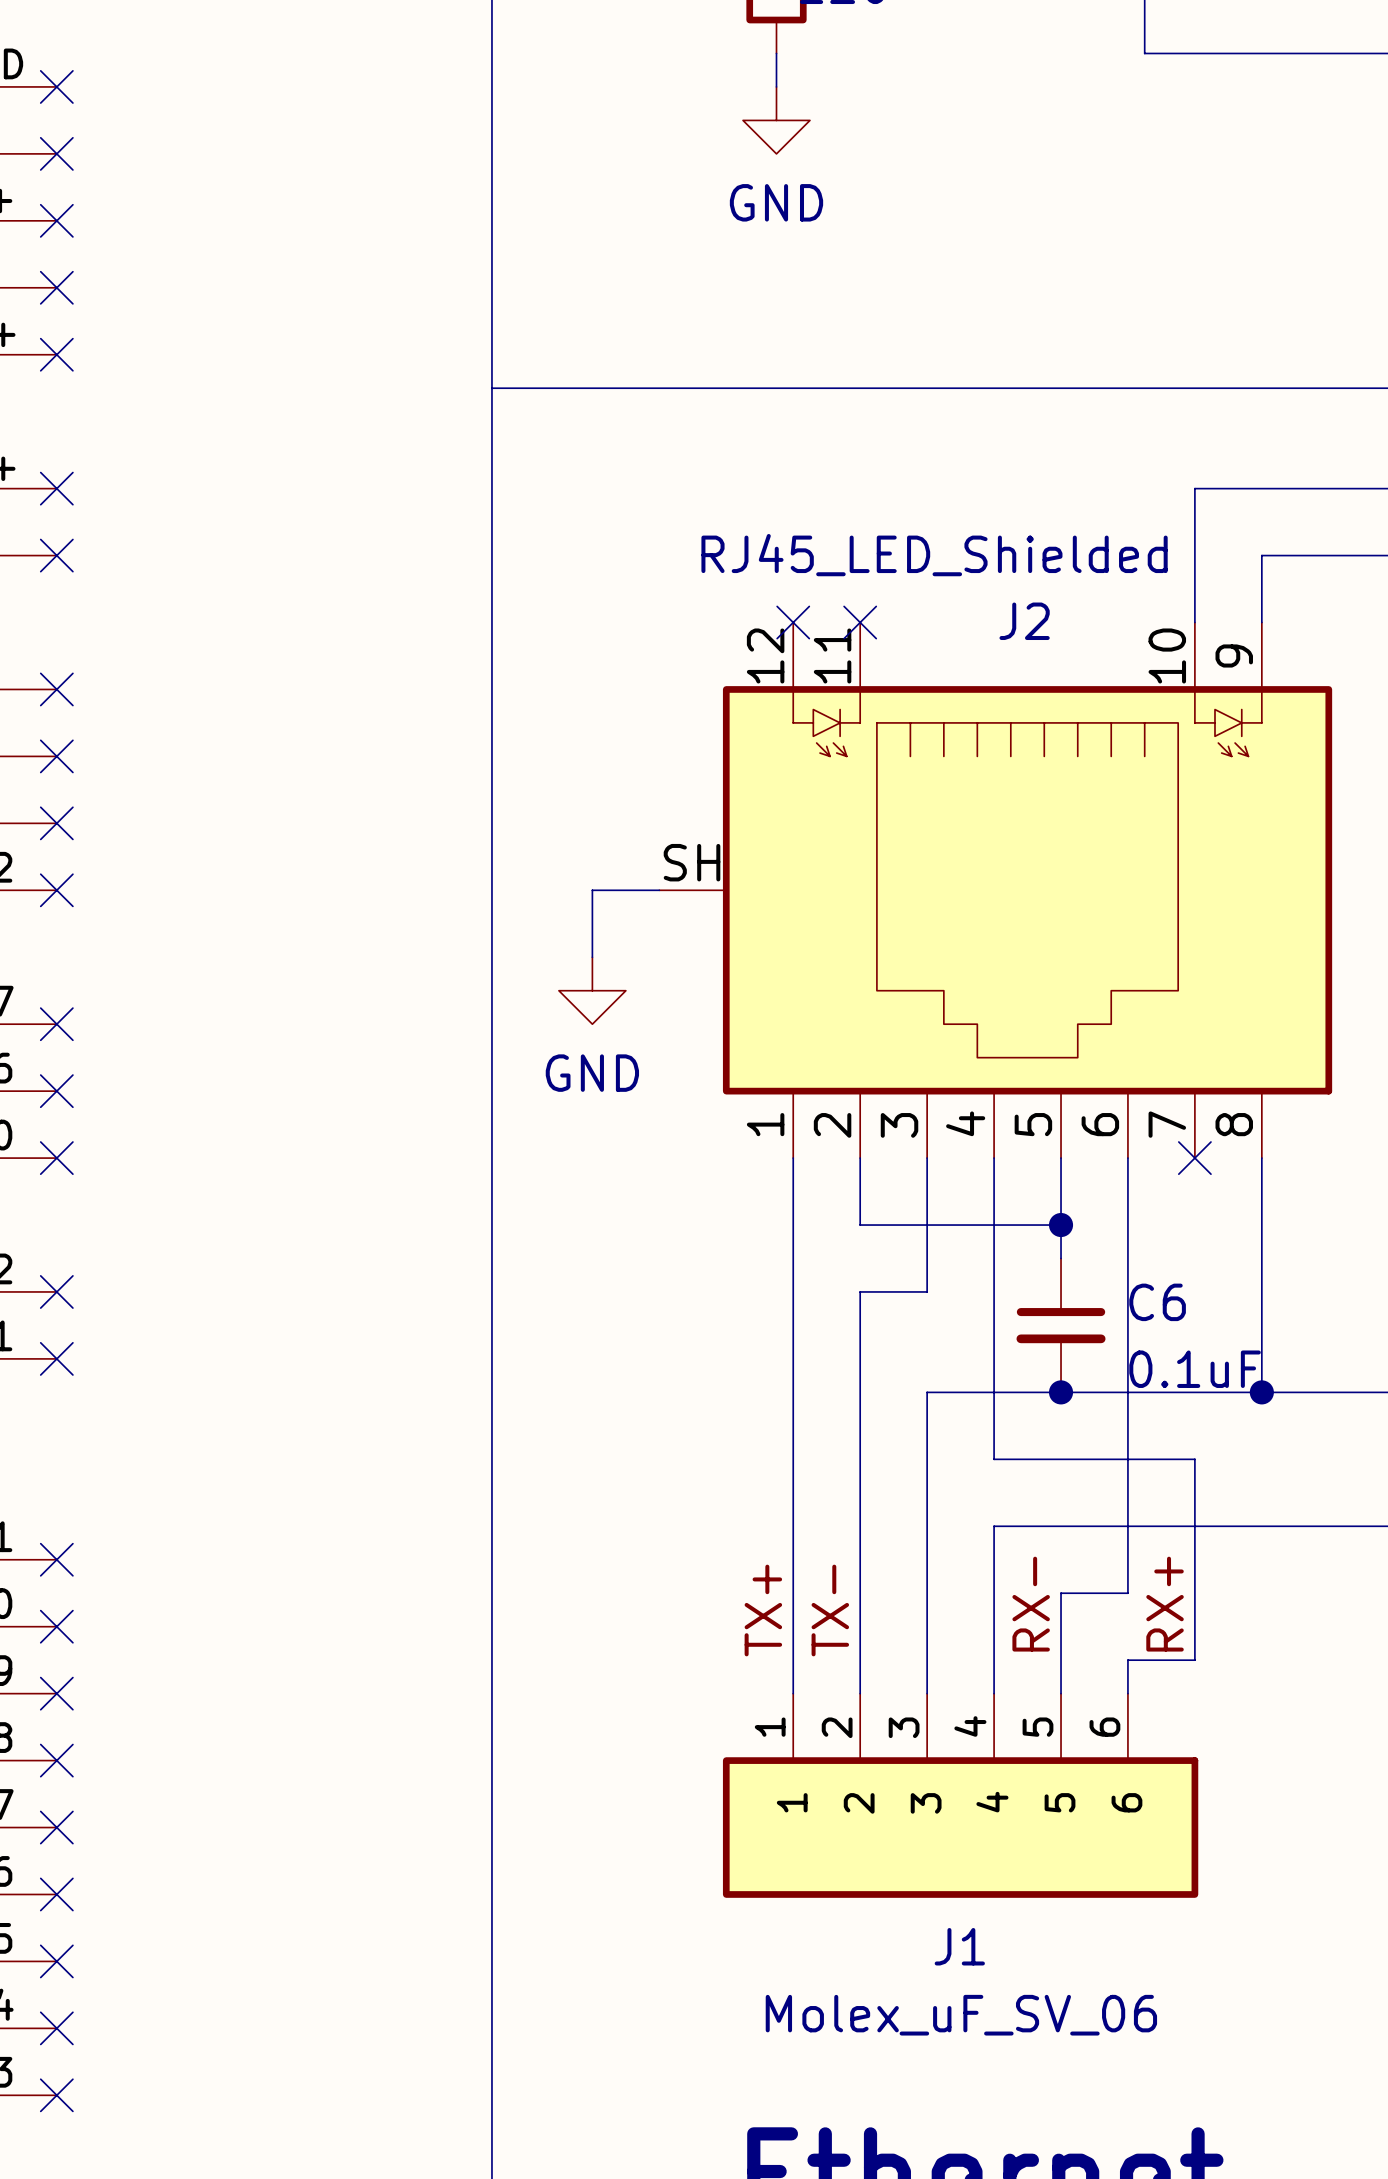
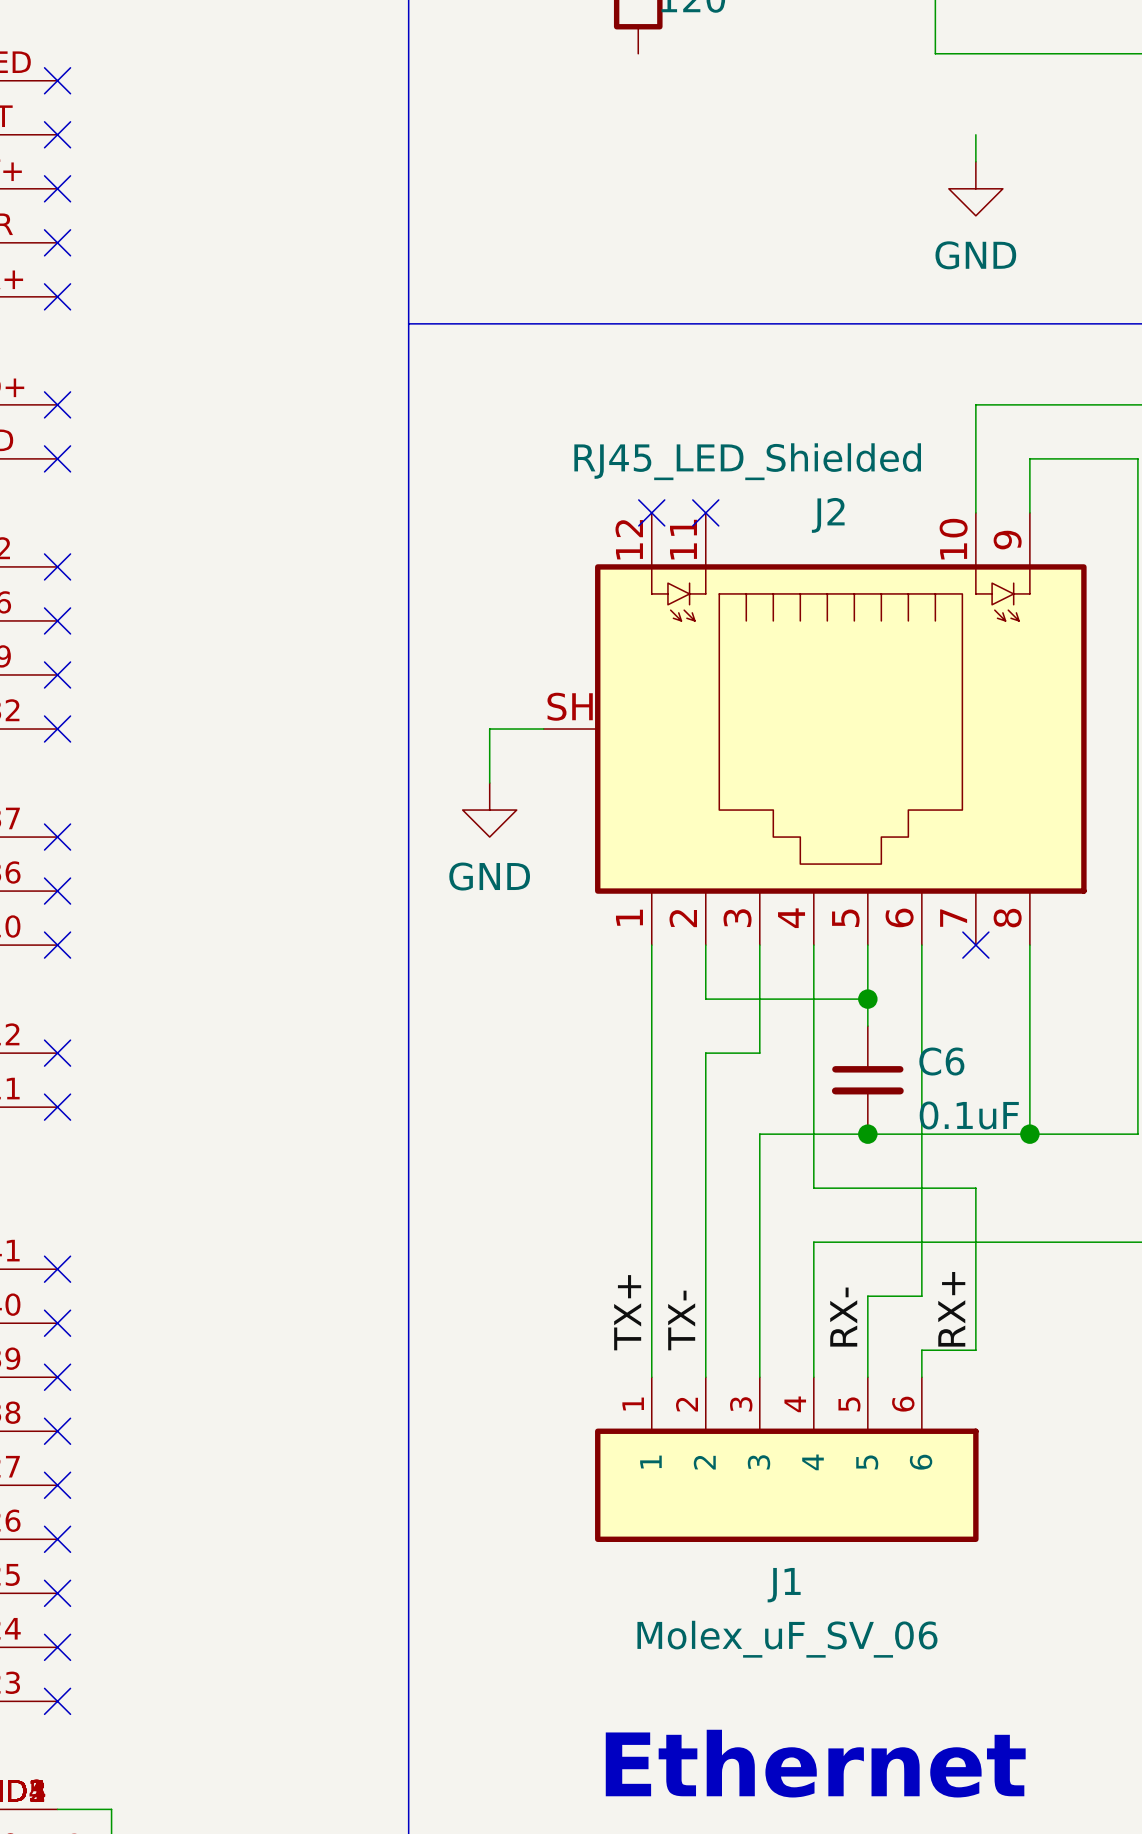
wire: (776, 53) (776, 86) -> (975, 134) (975, 161)
power symbol: GND (776, 120) -> none
power symbol: none -> GND (975, 188)

